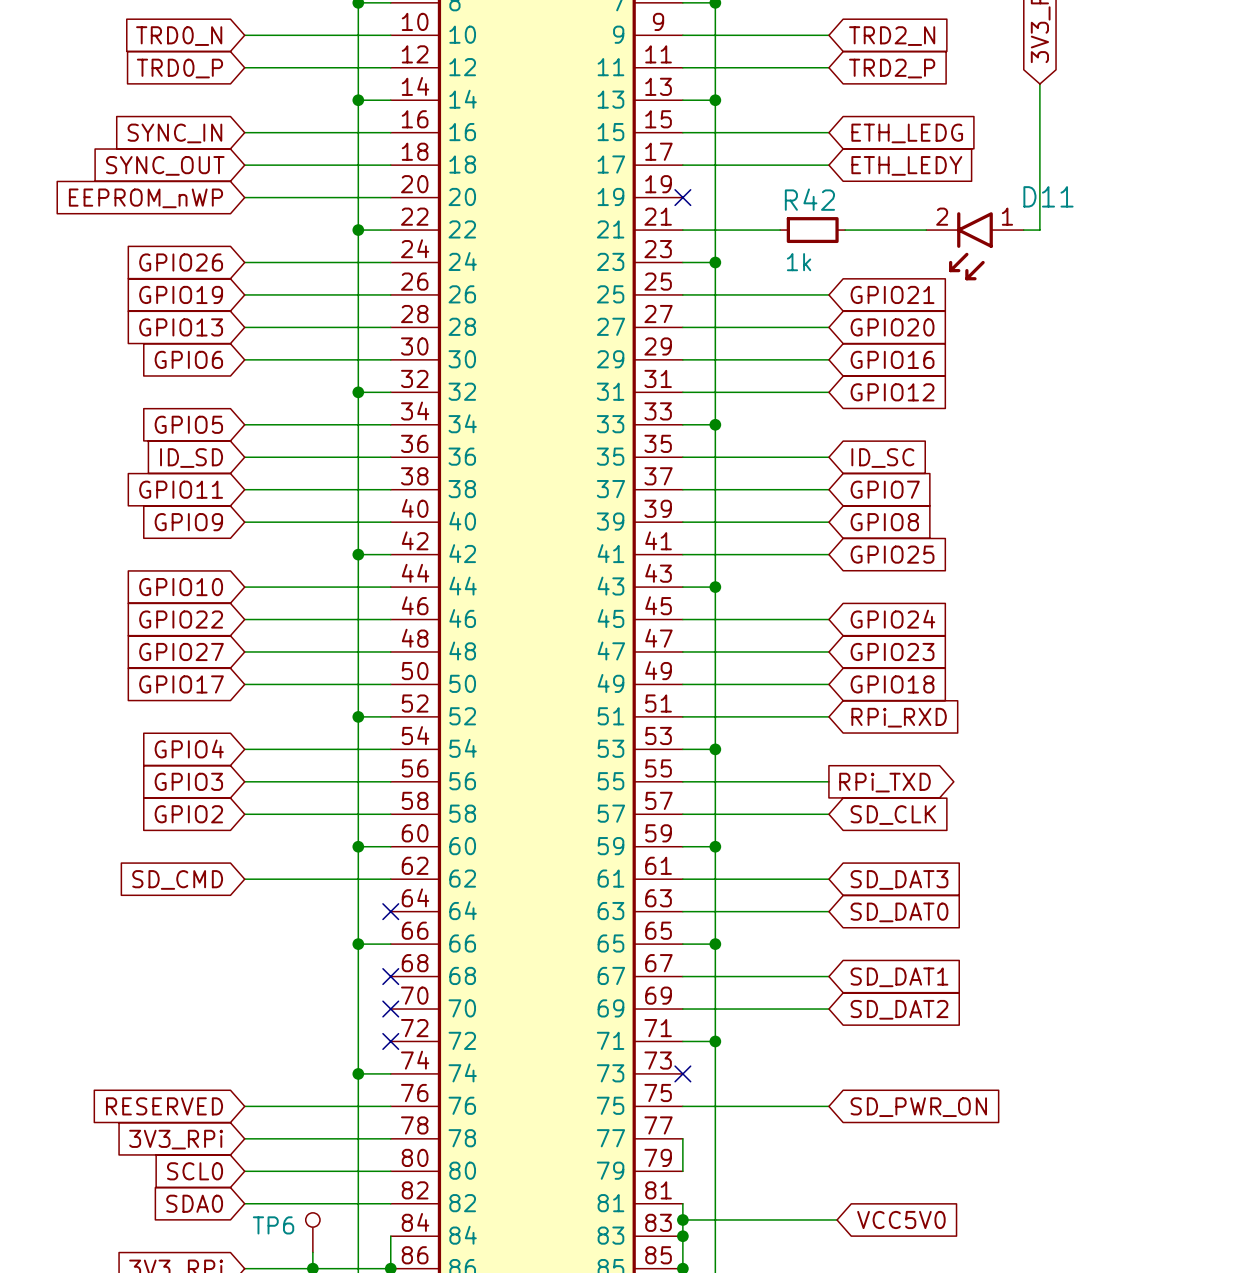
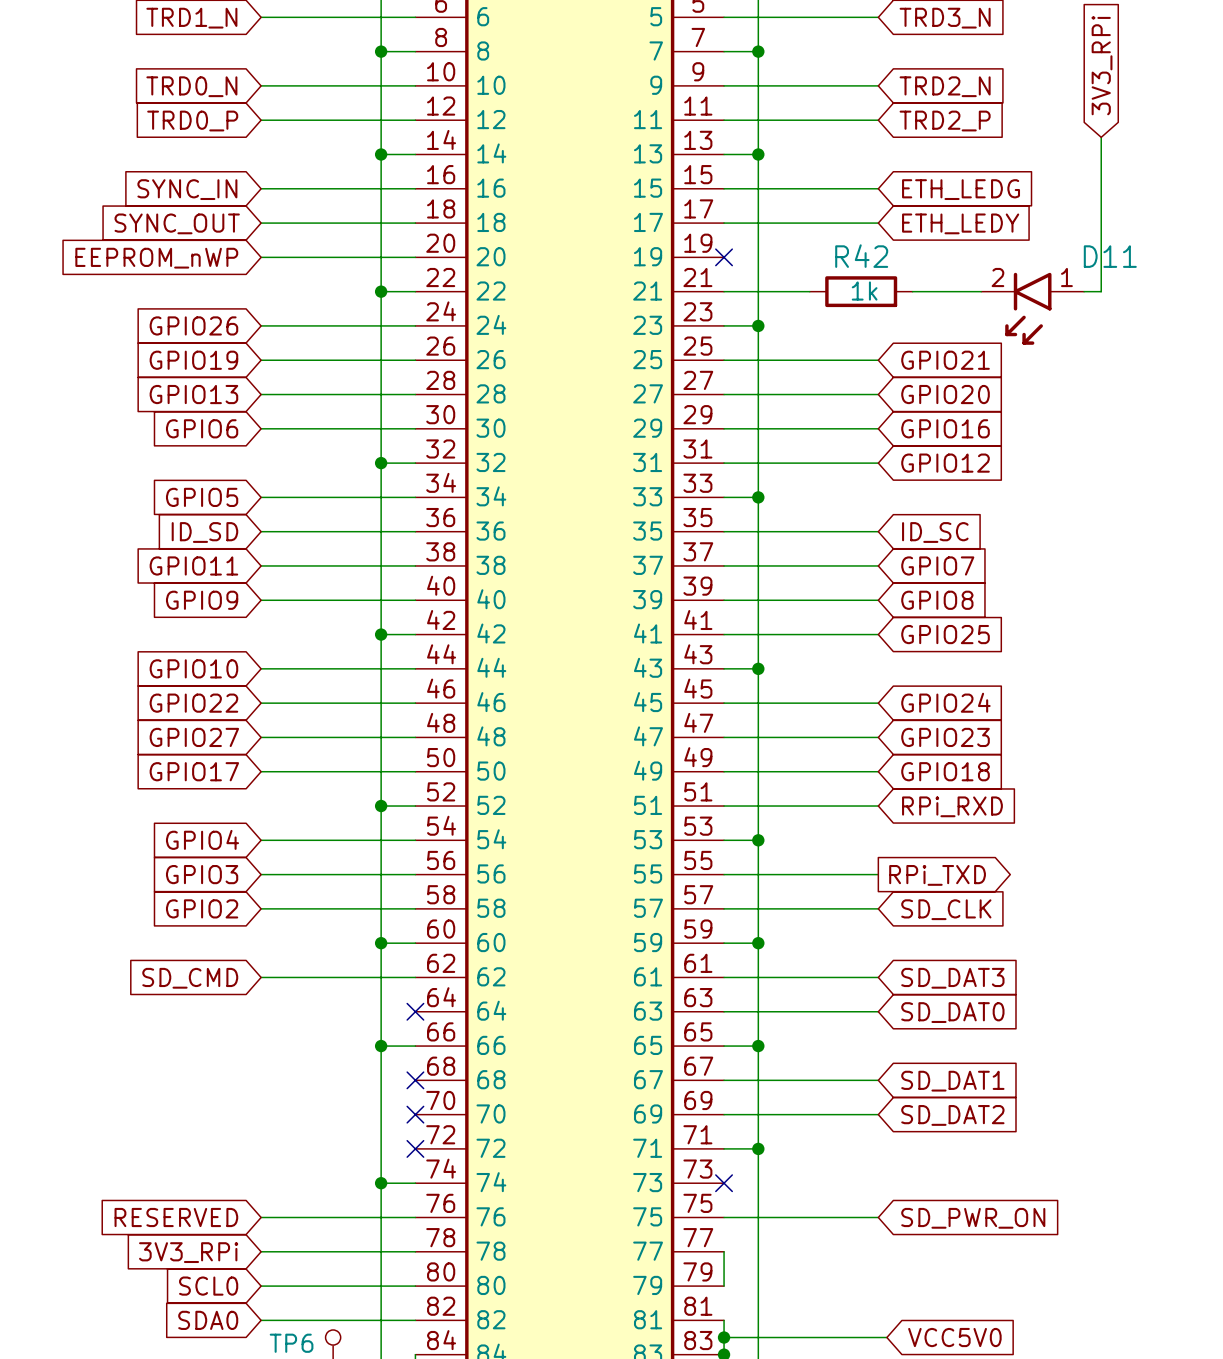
R42 symbol: [780, 217, 846, 244] -> [809, 276, 913, 308]
R42 text position: 1k (799, 262) -> 1k (864, 291)

